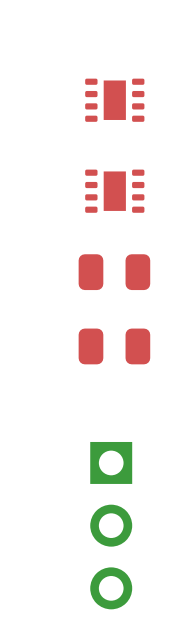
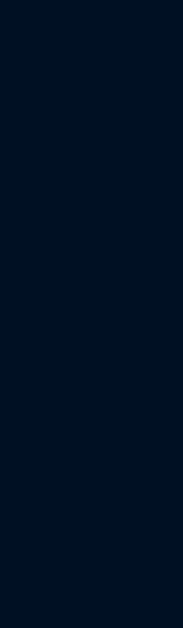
part: (114, 100) -> none
part: (114, 191) -> none
part: (114, 272) -> none
part: (114, 346) -> none
part: (111, 525) -> none

